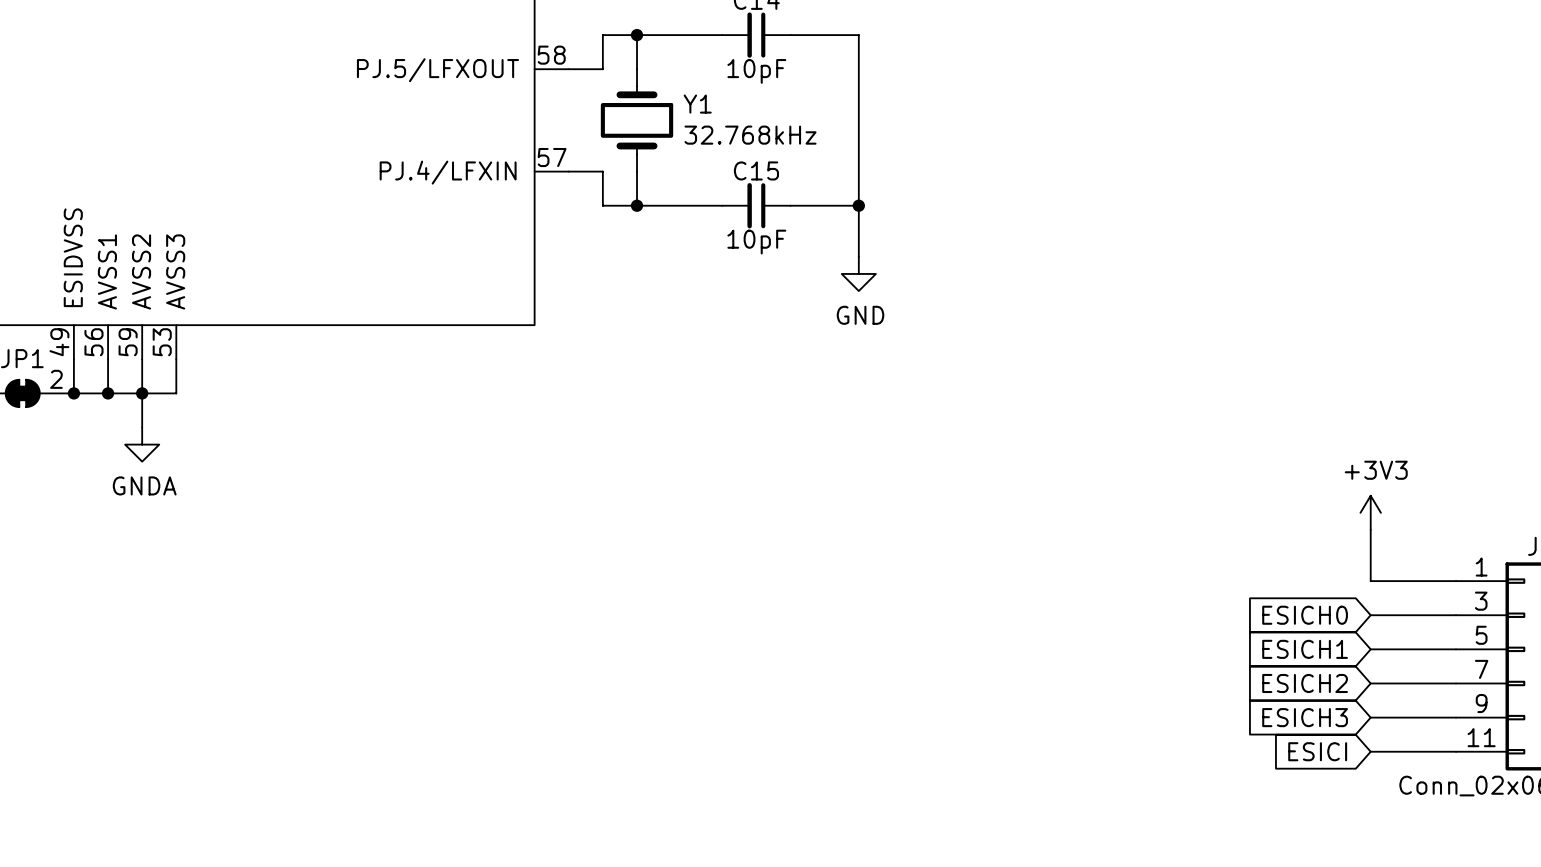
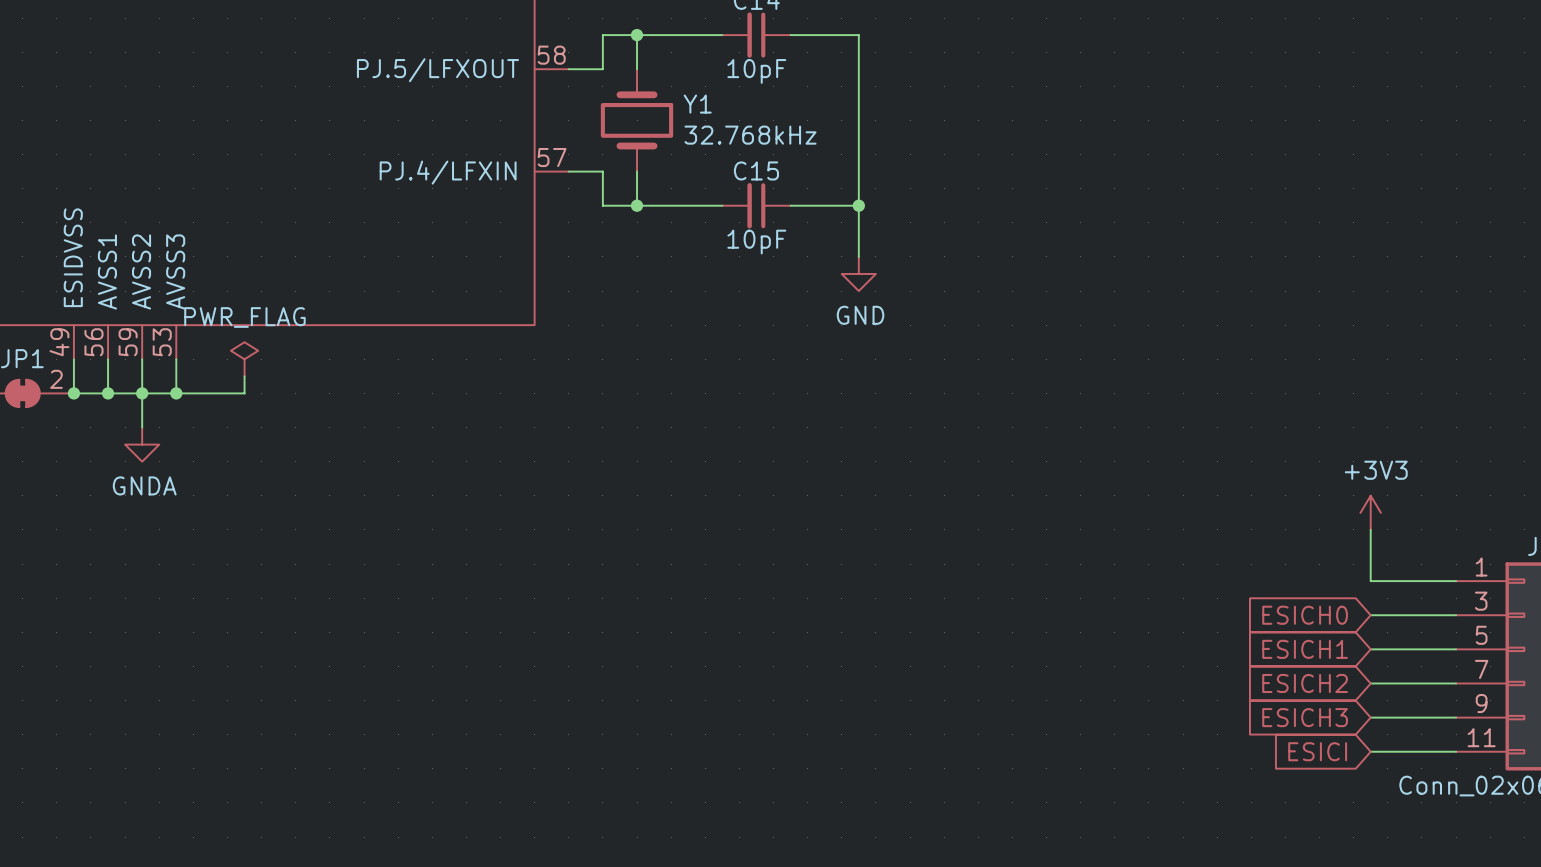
power symbol: none -> PWR_FLAG (244, 359)
wire: none -> (244, 376) (244, 393) (176, 393)
junction: none -> (176, 393)

